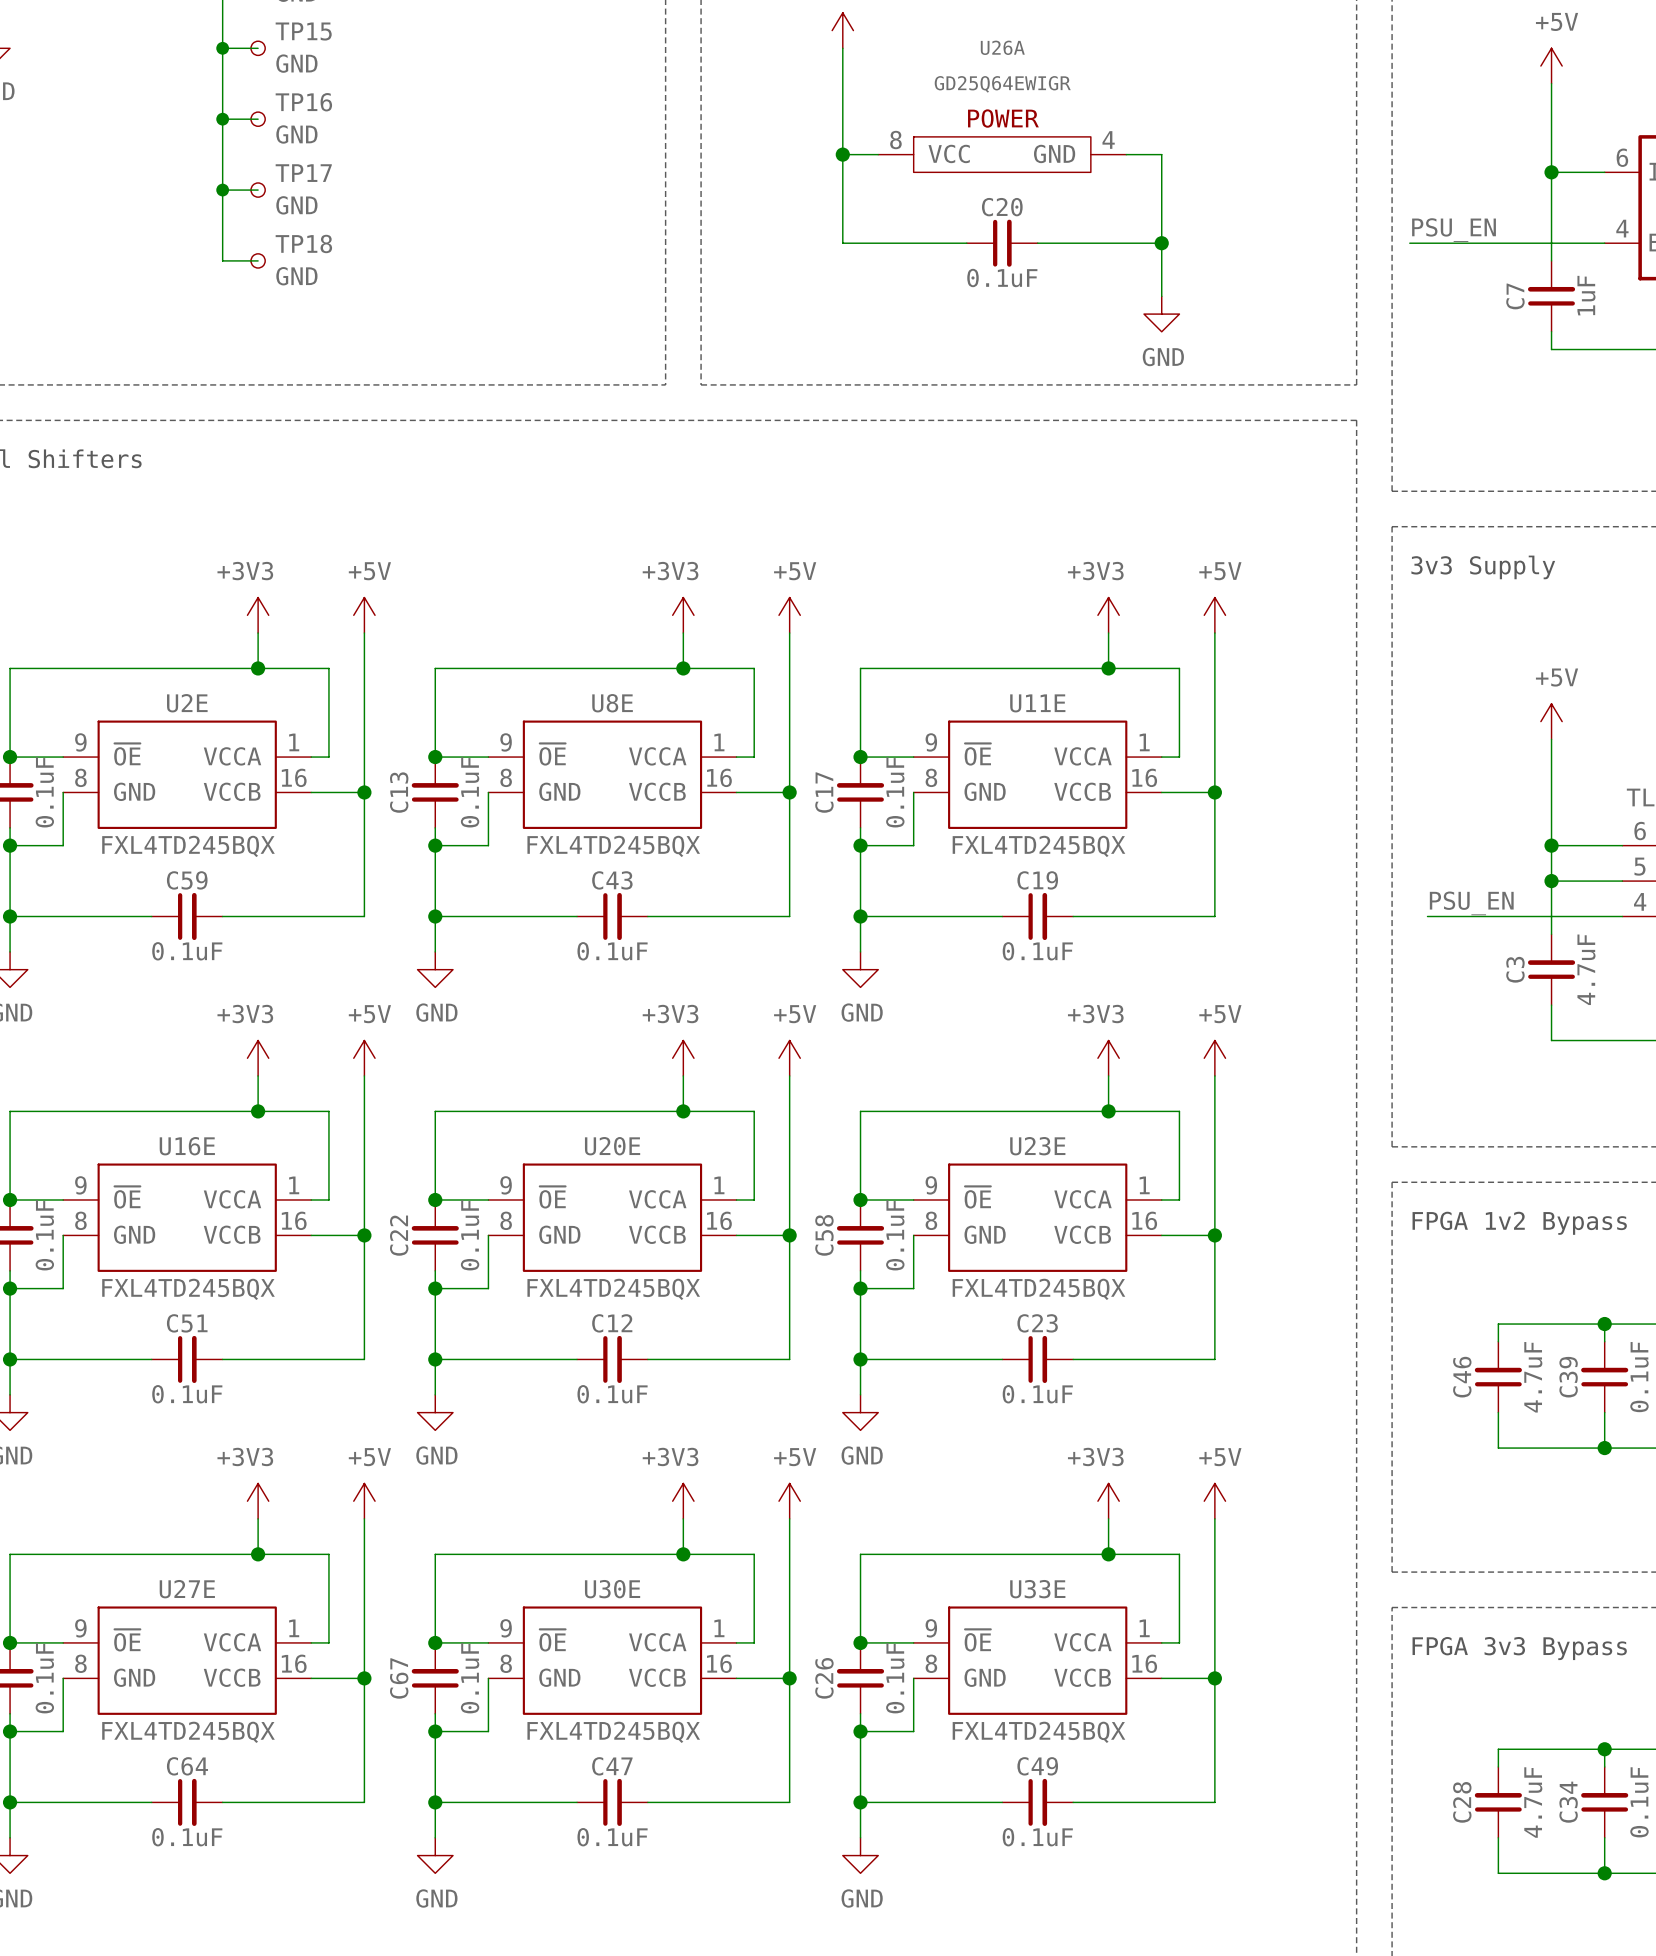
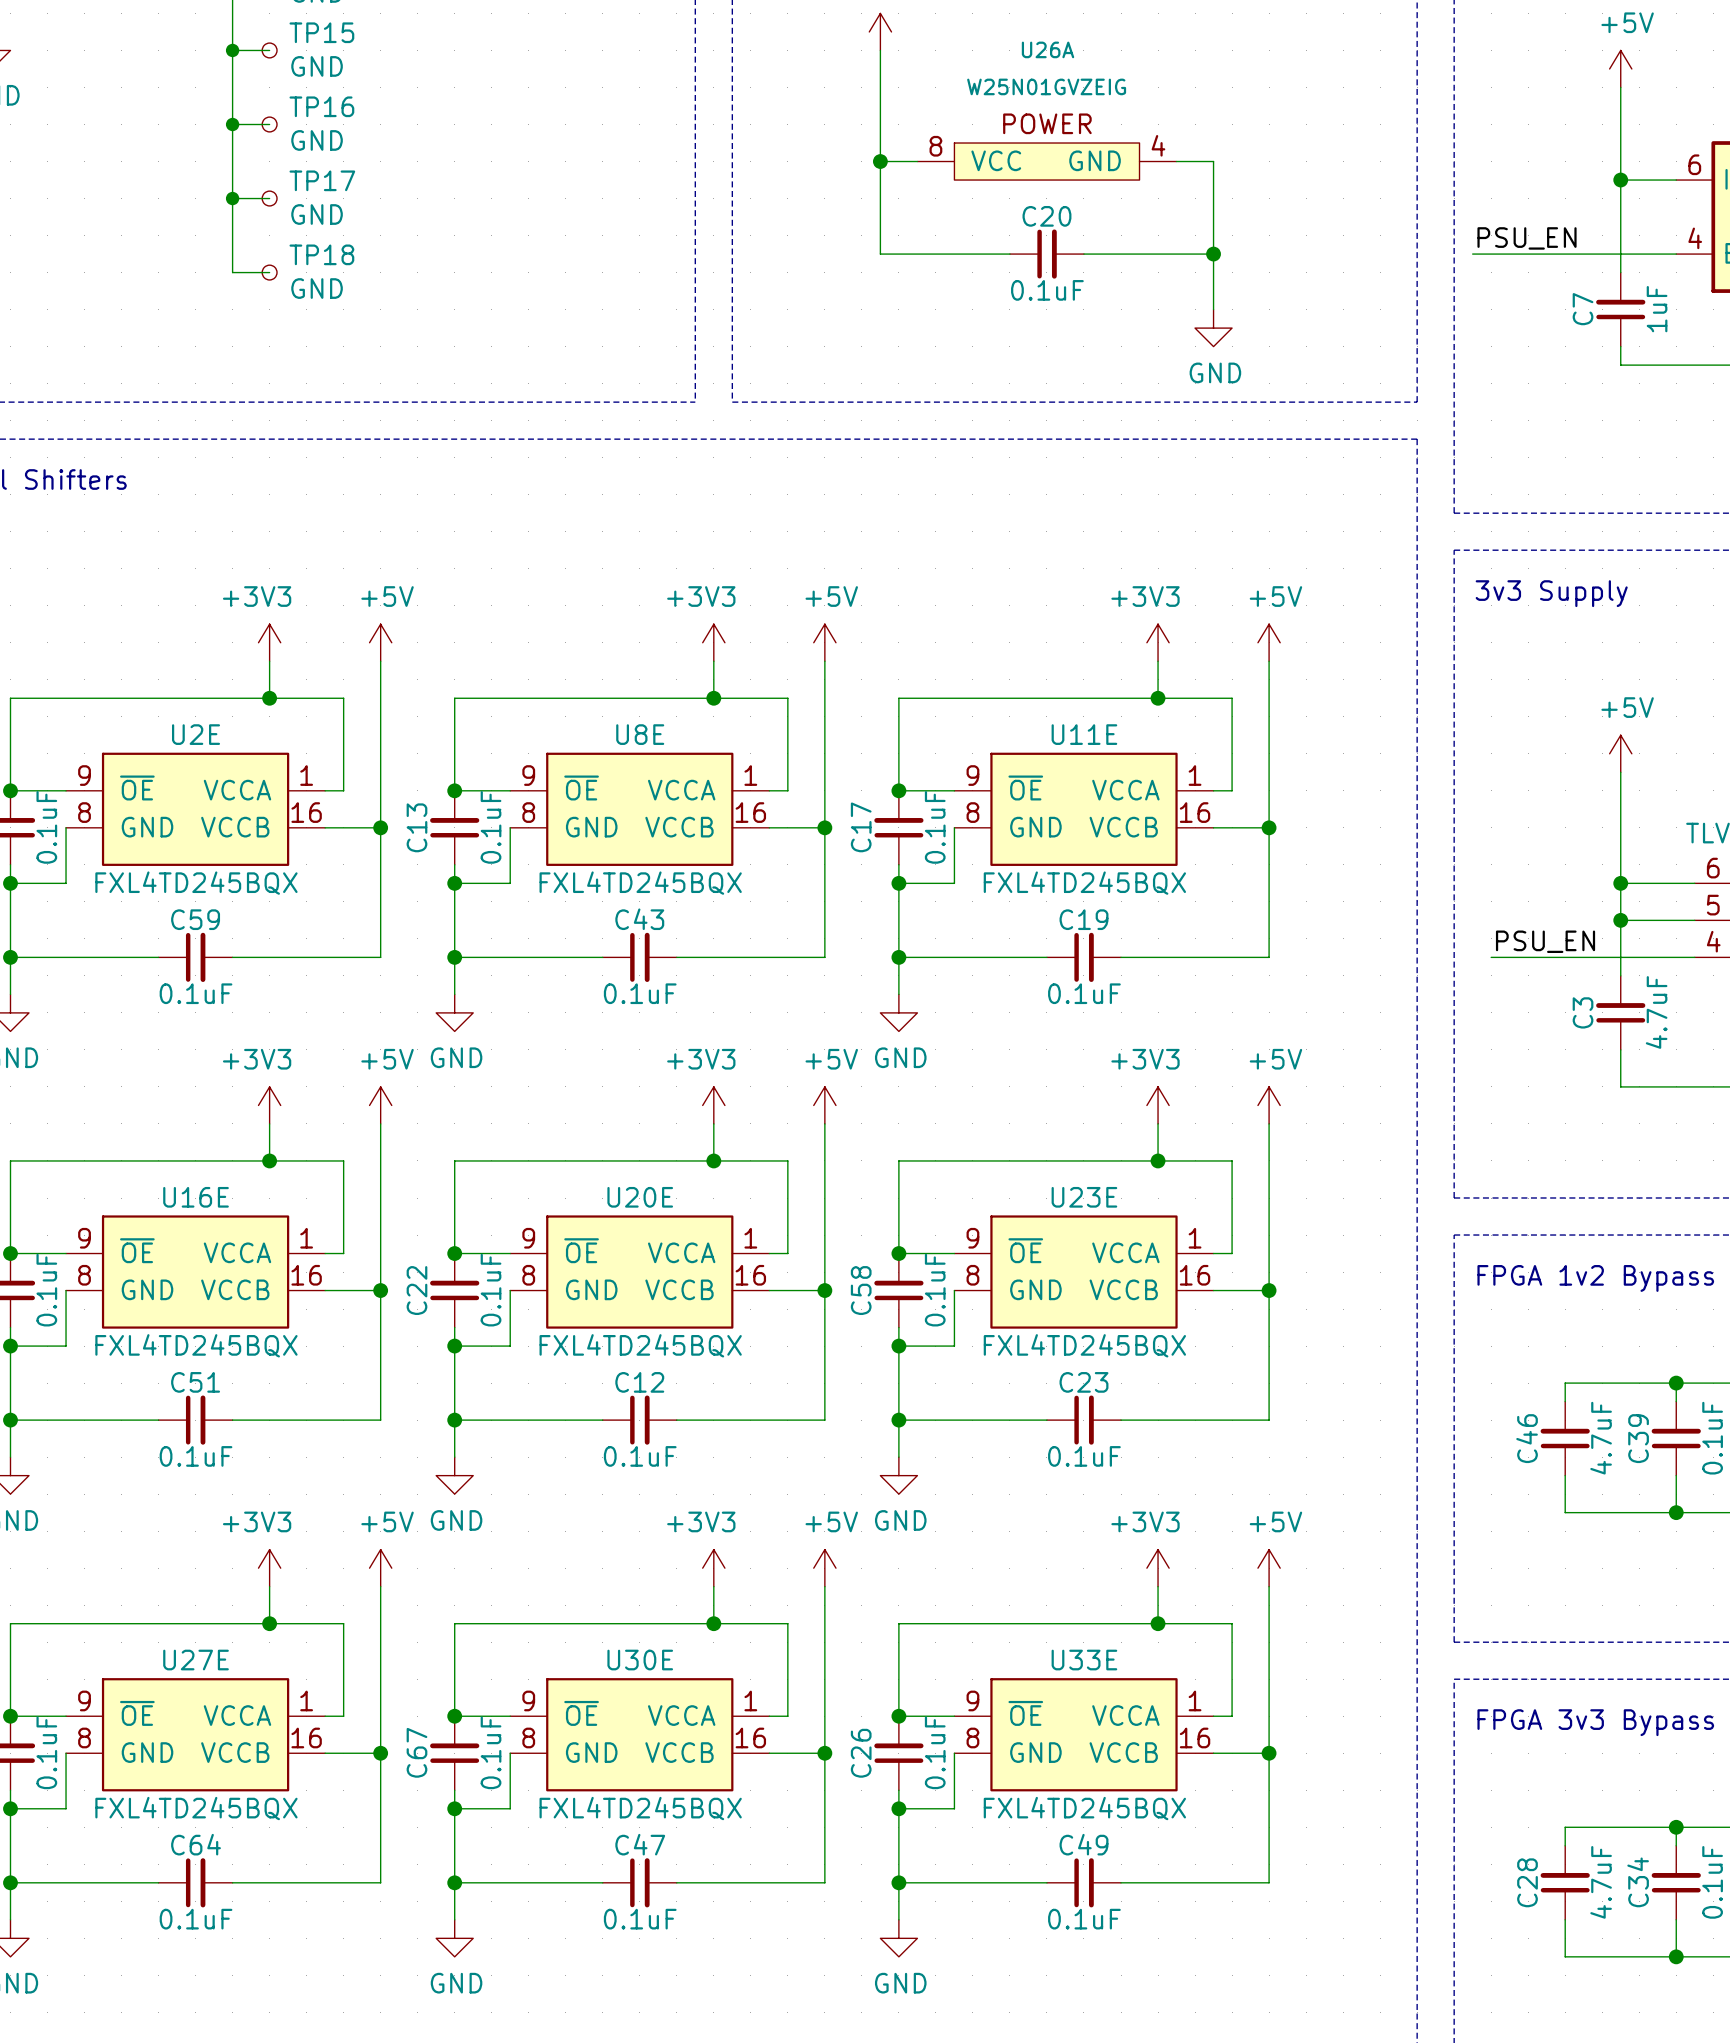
U26A value: GD25Q64EWIGR (1002, 84) -> W25N01GVZEIG (1046, 86)

